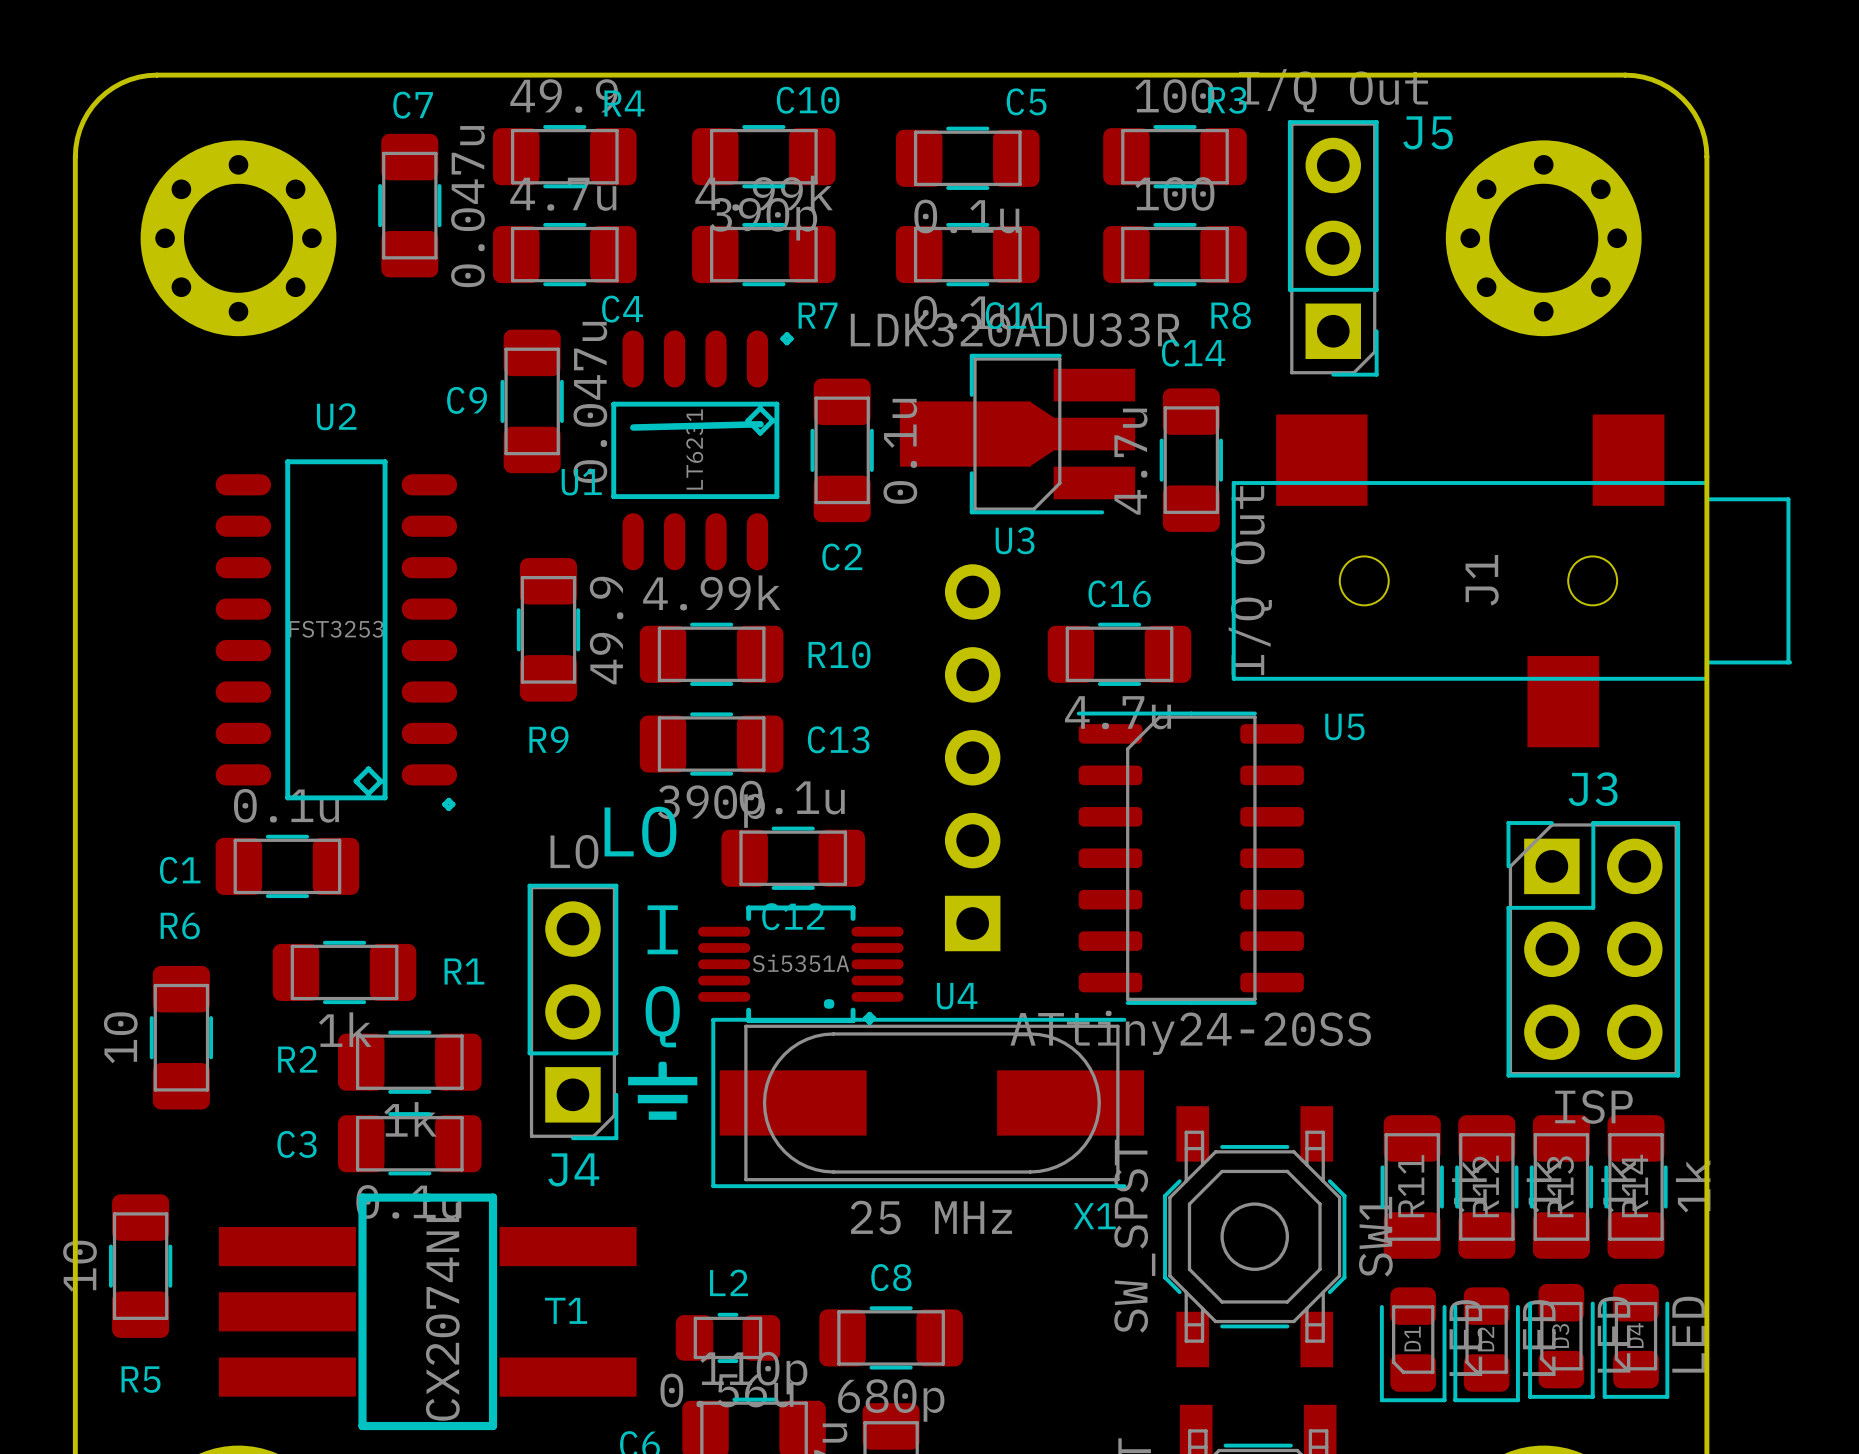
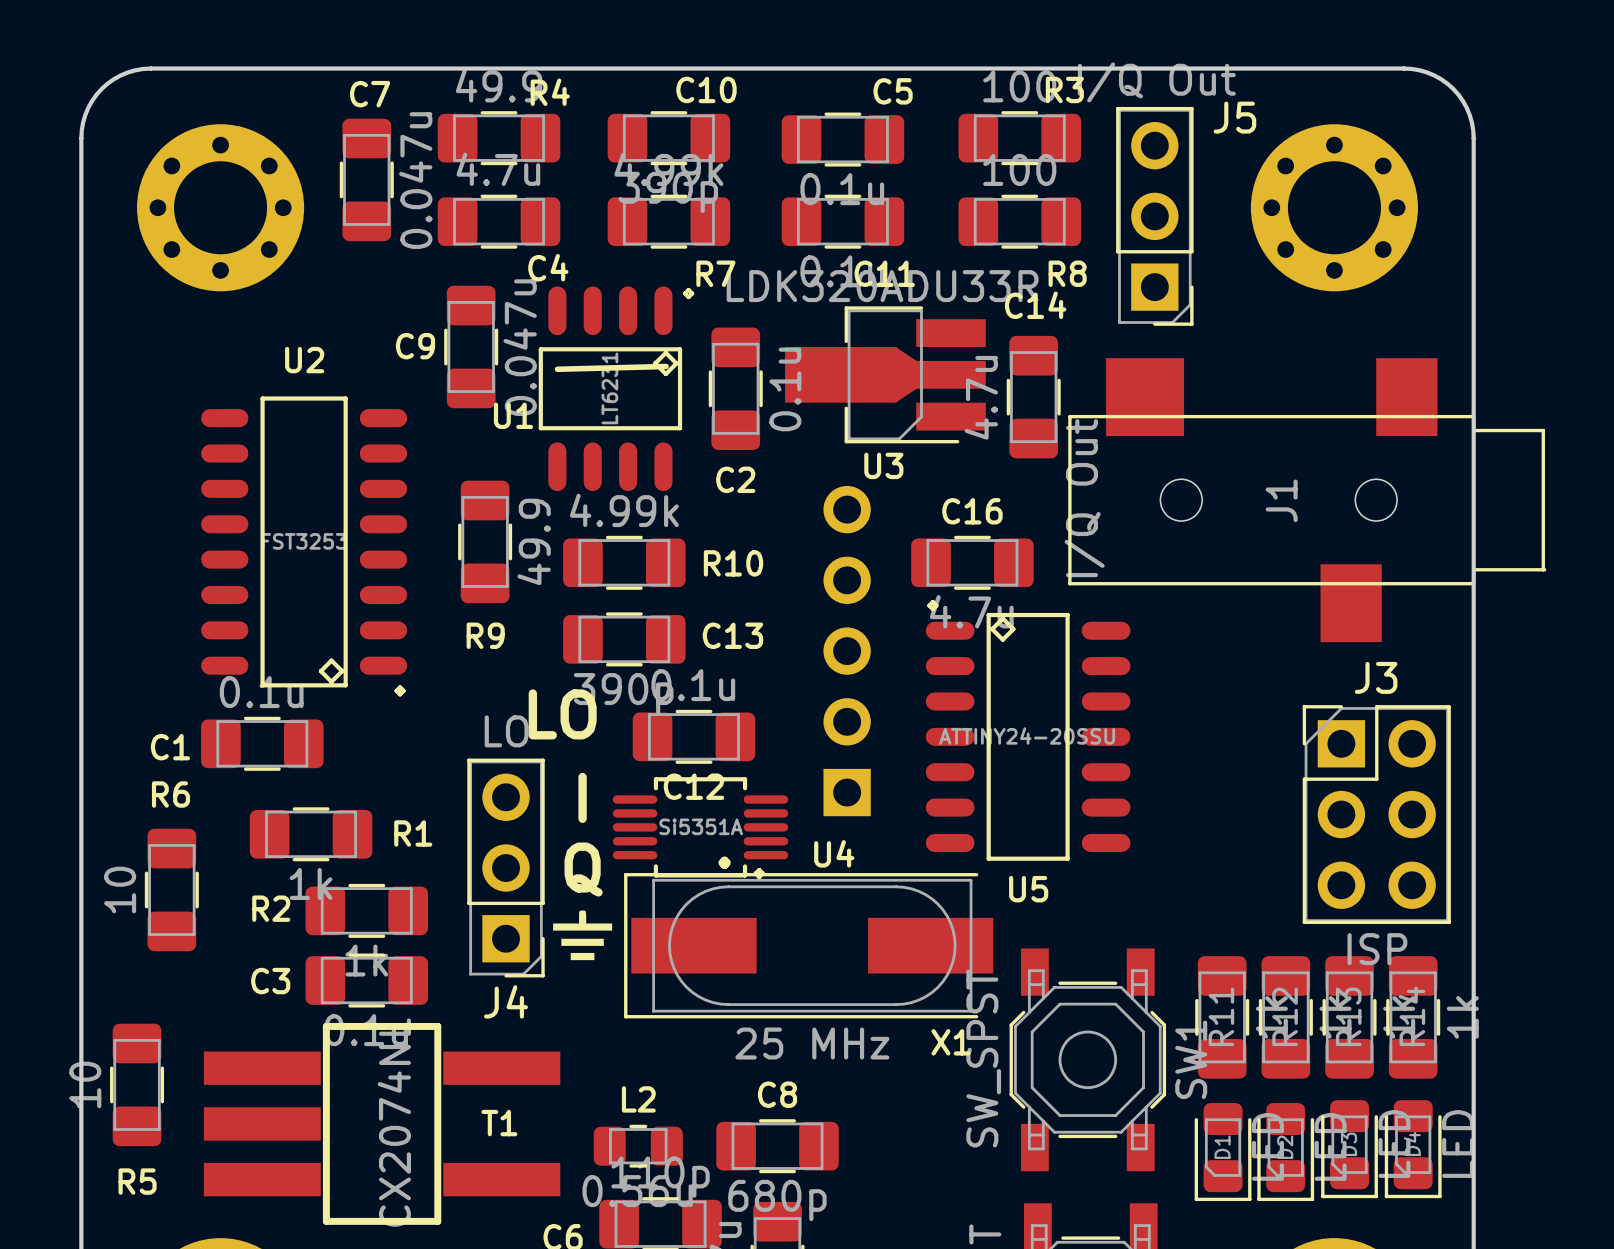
U5 footprint: [1076, 711, 1304, 1005] -> [925, 599, 1131, 861]
U5 name position: U5 (1344, 726) -> U5 (1028, 889)
U5 value: ATtiny24-20SS (1190, 1032) -> ATTINY24-20SSU (1027, 736)

